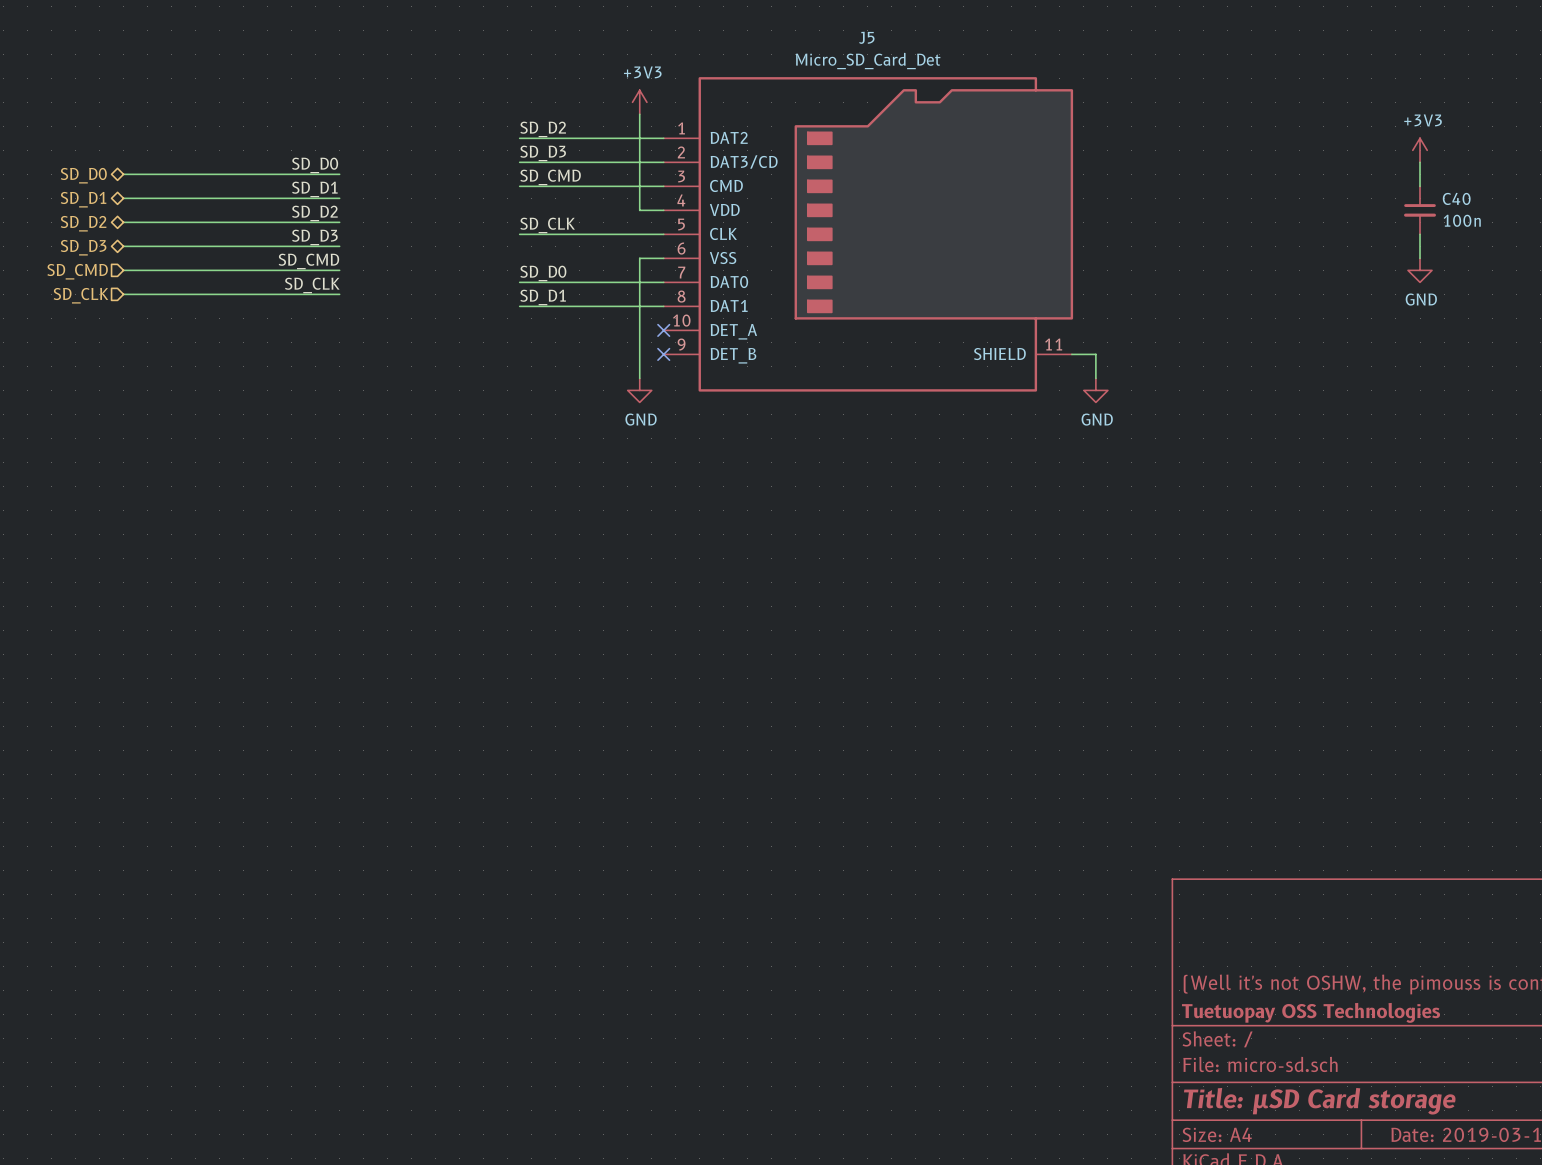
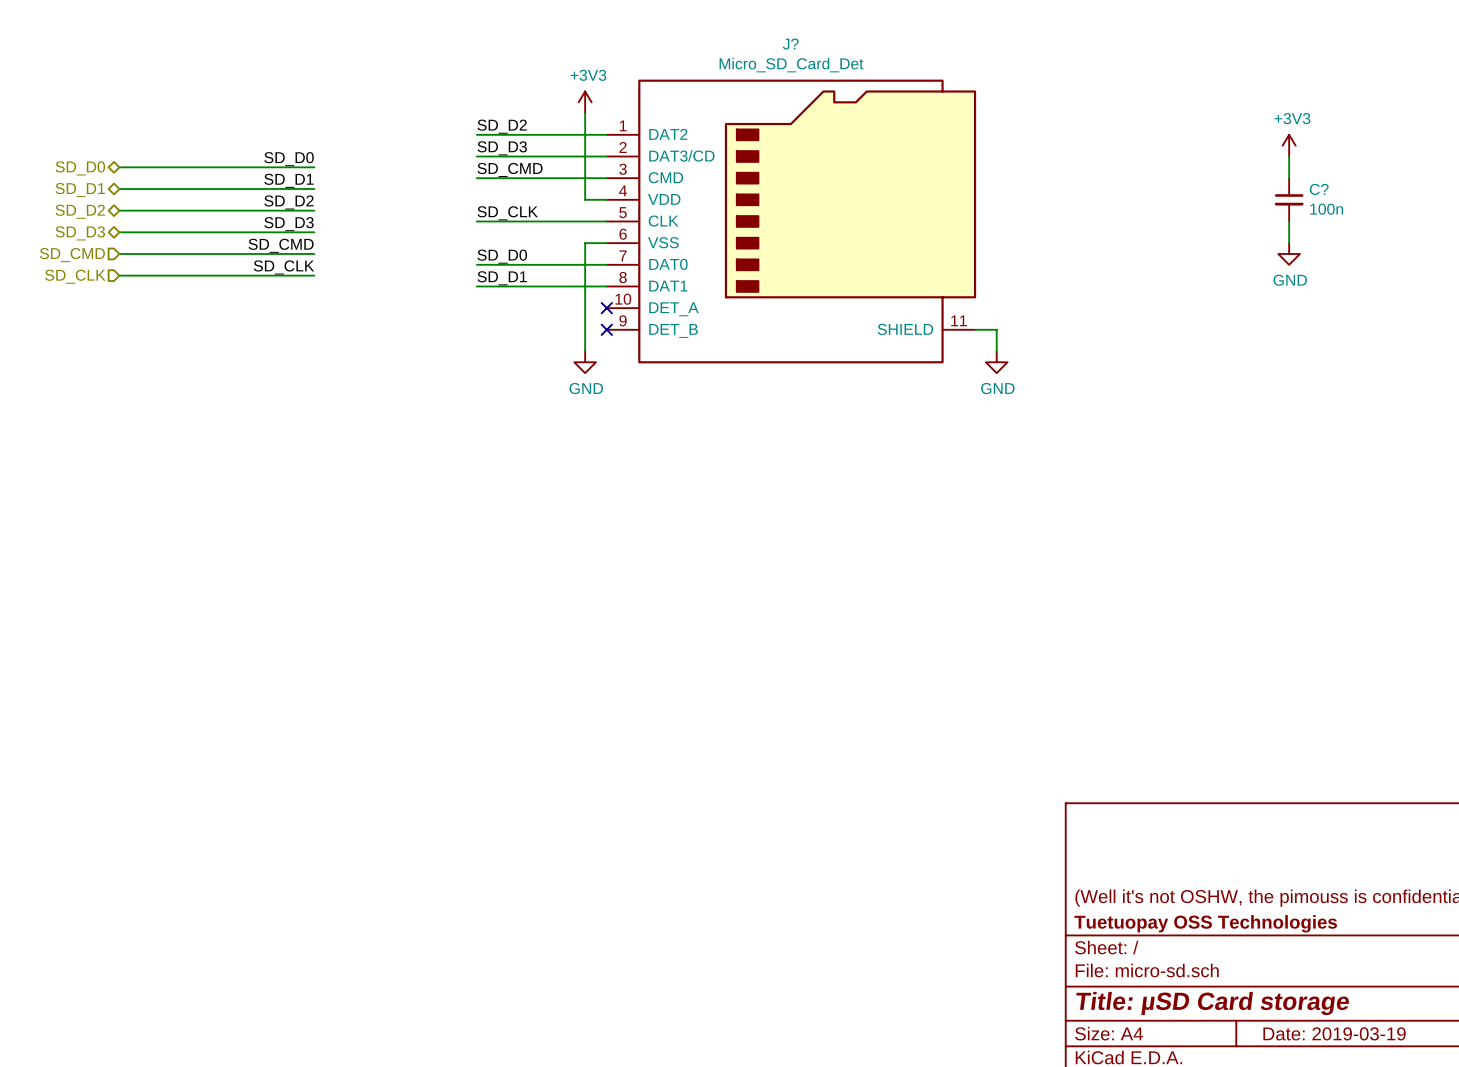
J5 name: J5 (866, 37) -> J? (790, 44)
C40 name: C40 (1456, 198) -> C? (1319, 189)

